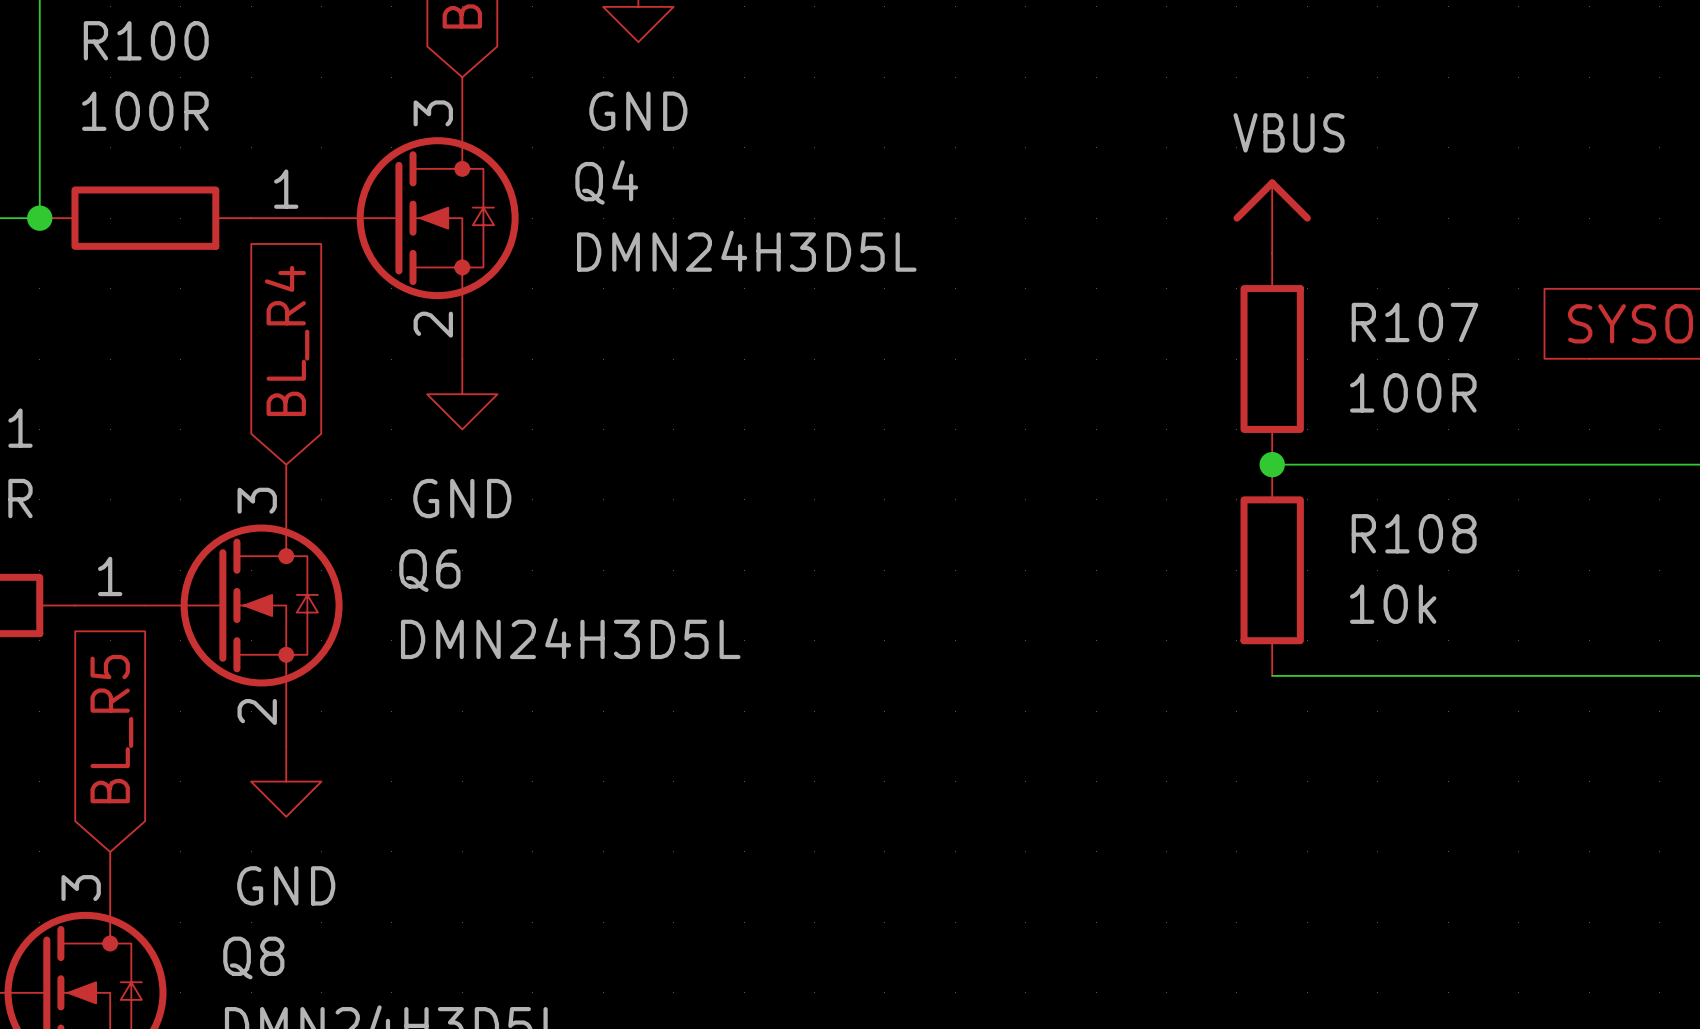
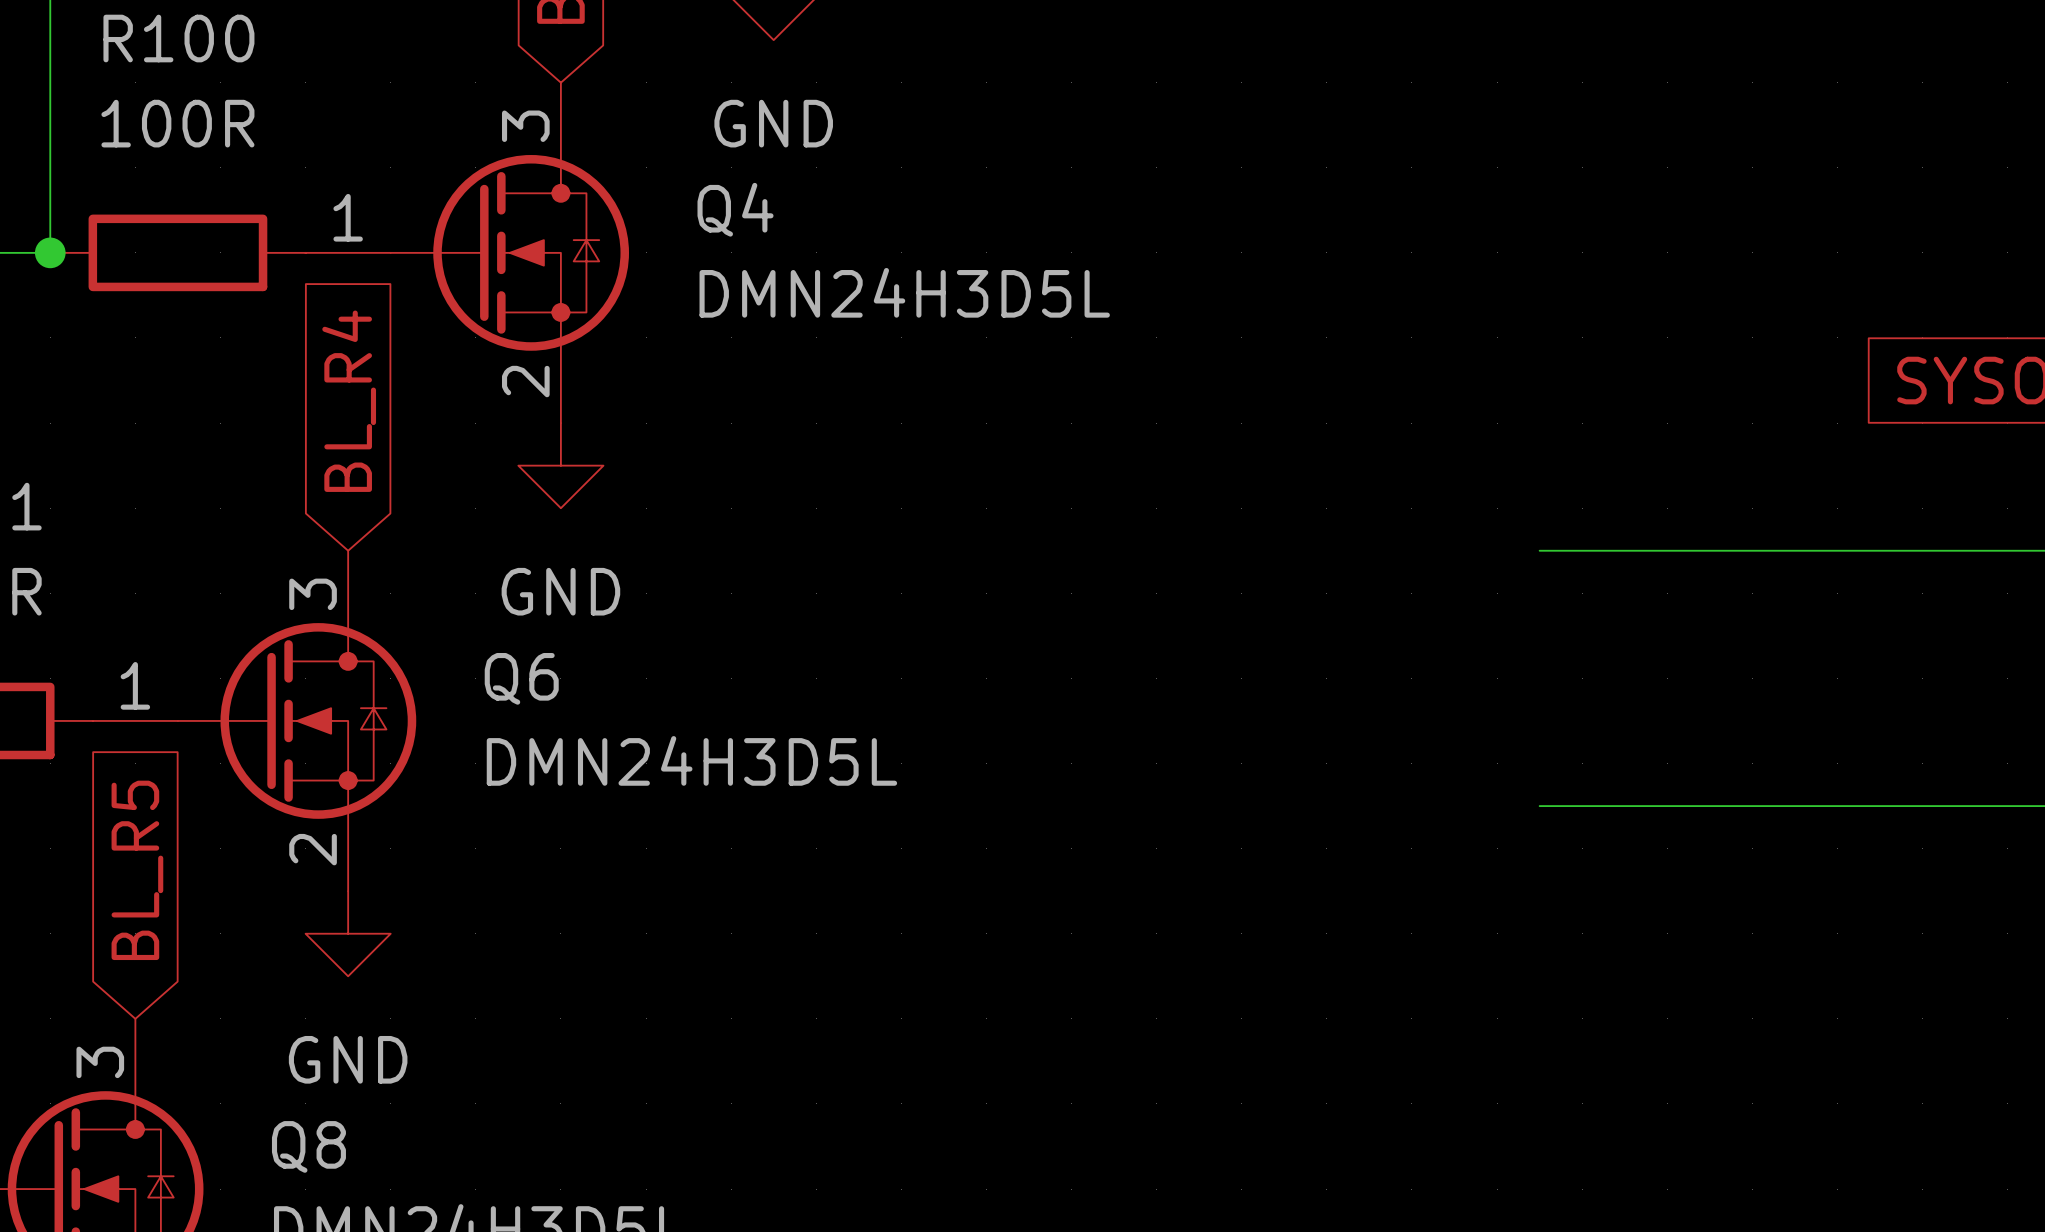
power symbol: VBUS (1272, 216) -> none
R107: 100R (1272, 359) -> none
junction: (1272, 464) -> none
R108: 10k (1272, 570) -> none

